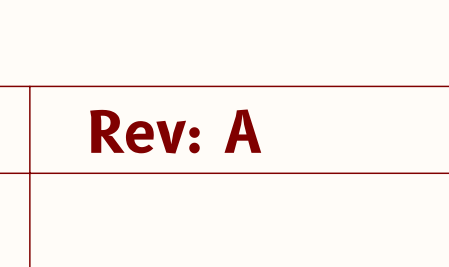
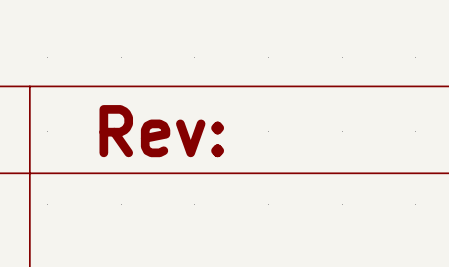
title block: Rev: A (175, 131) -> Rev: (161, 131)

